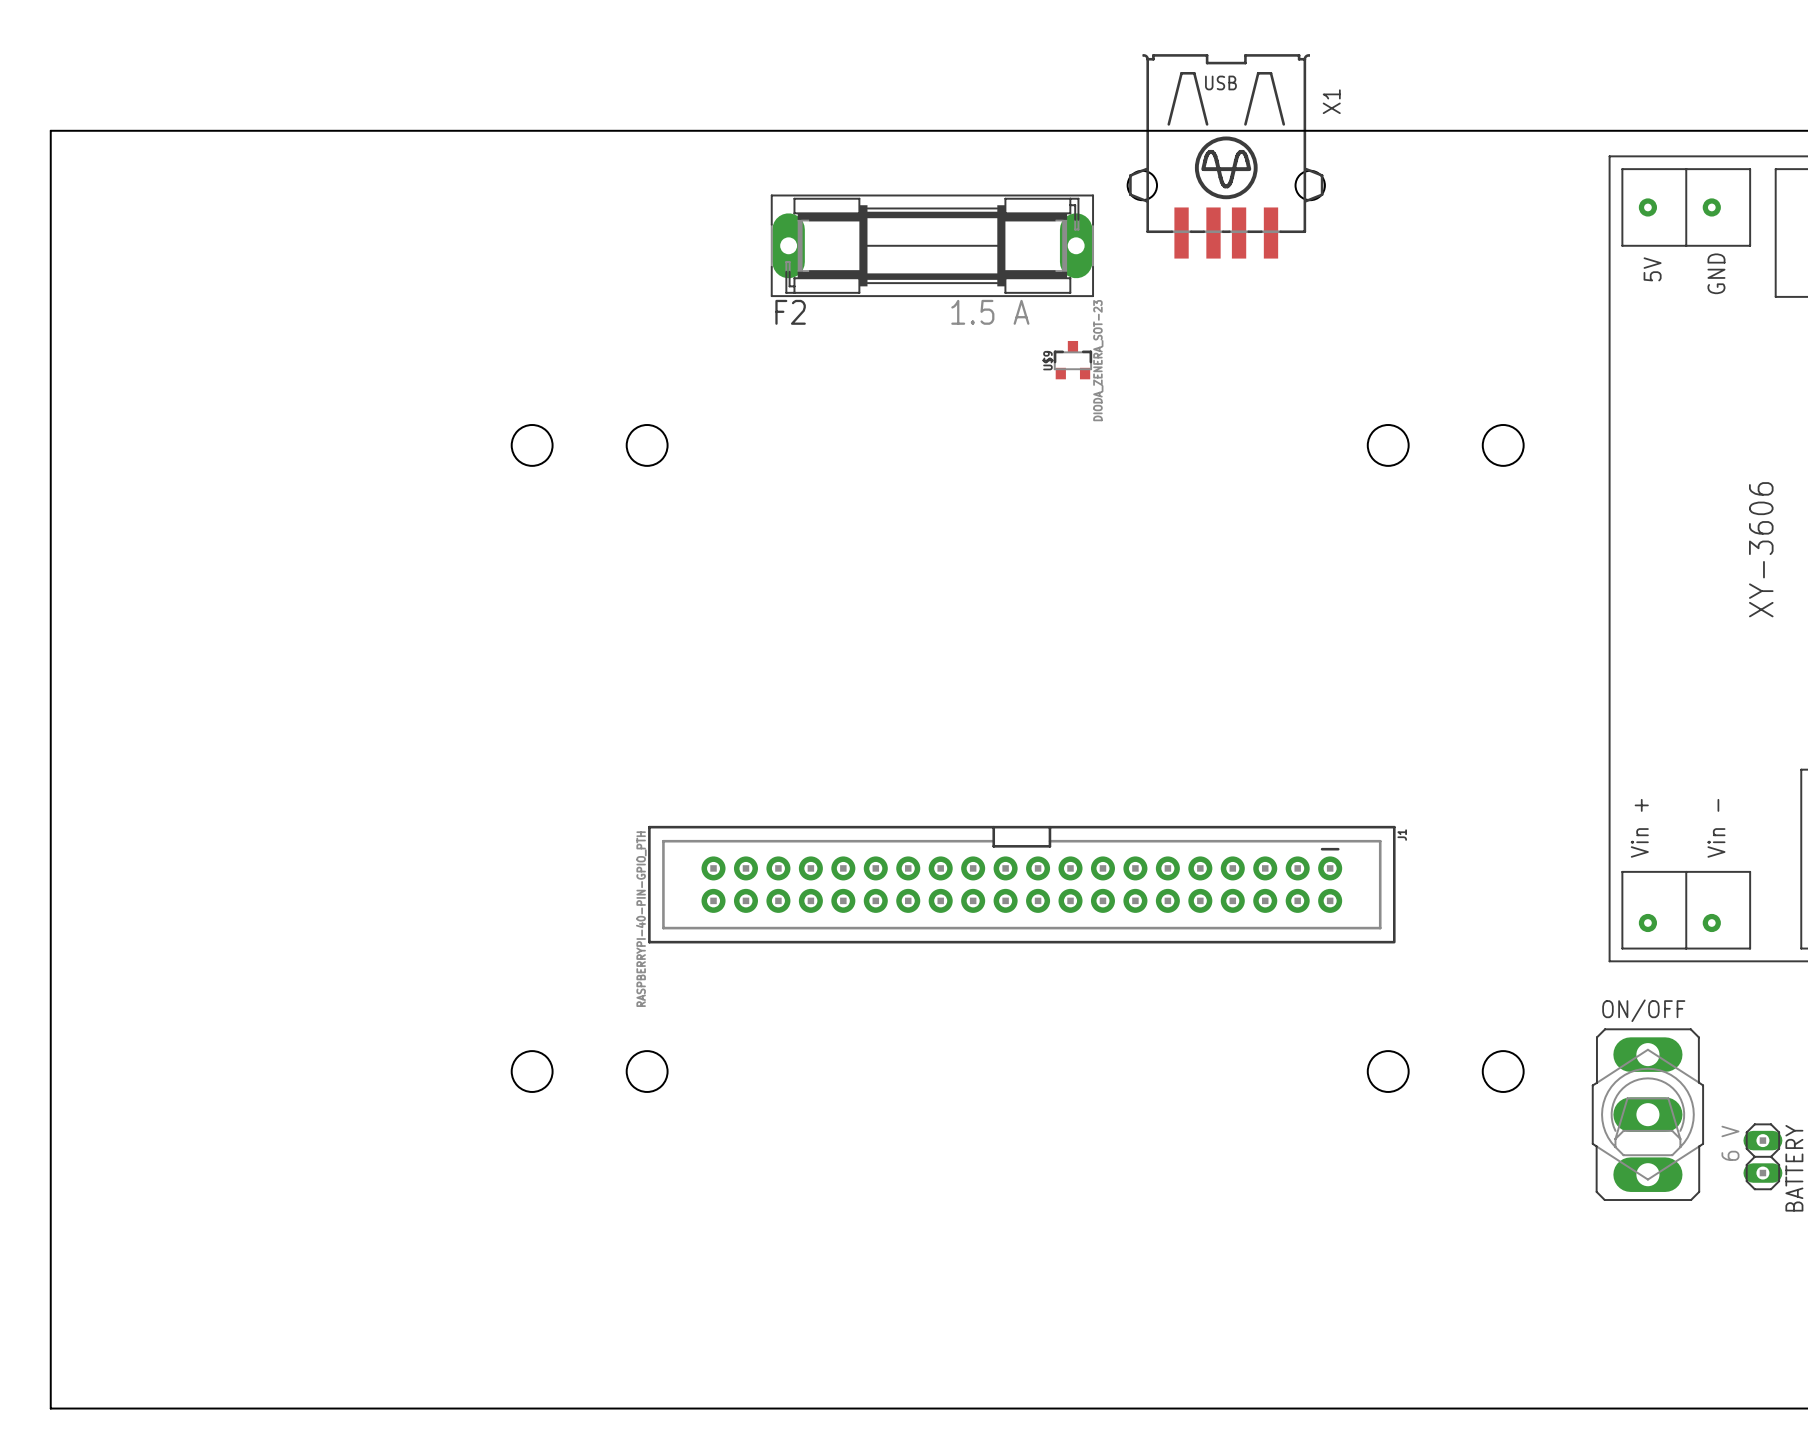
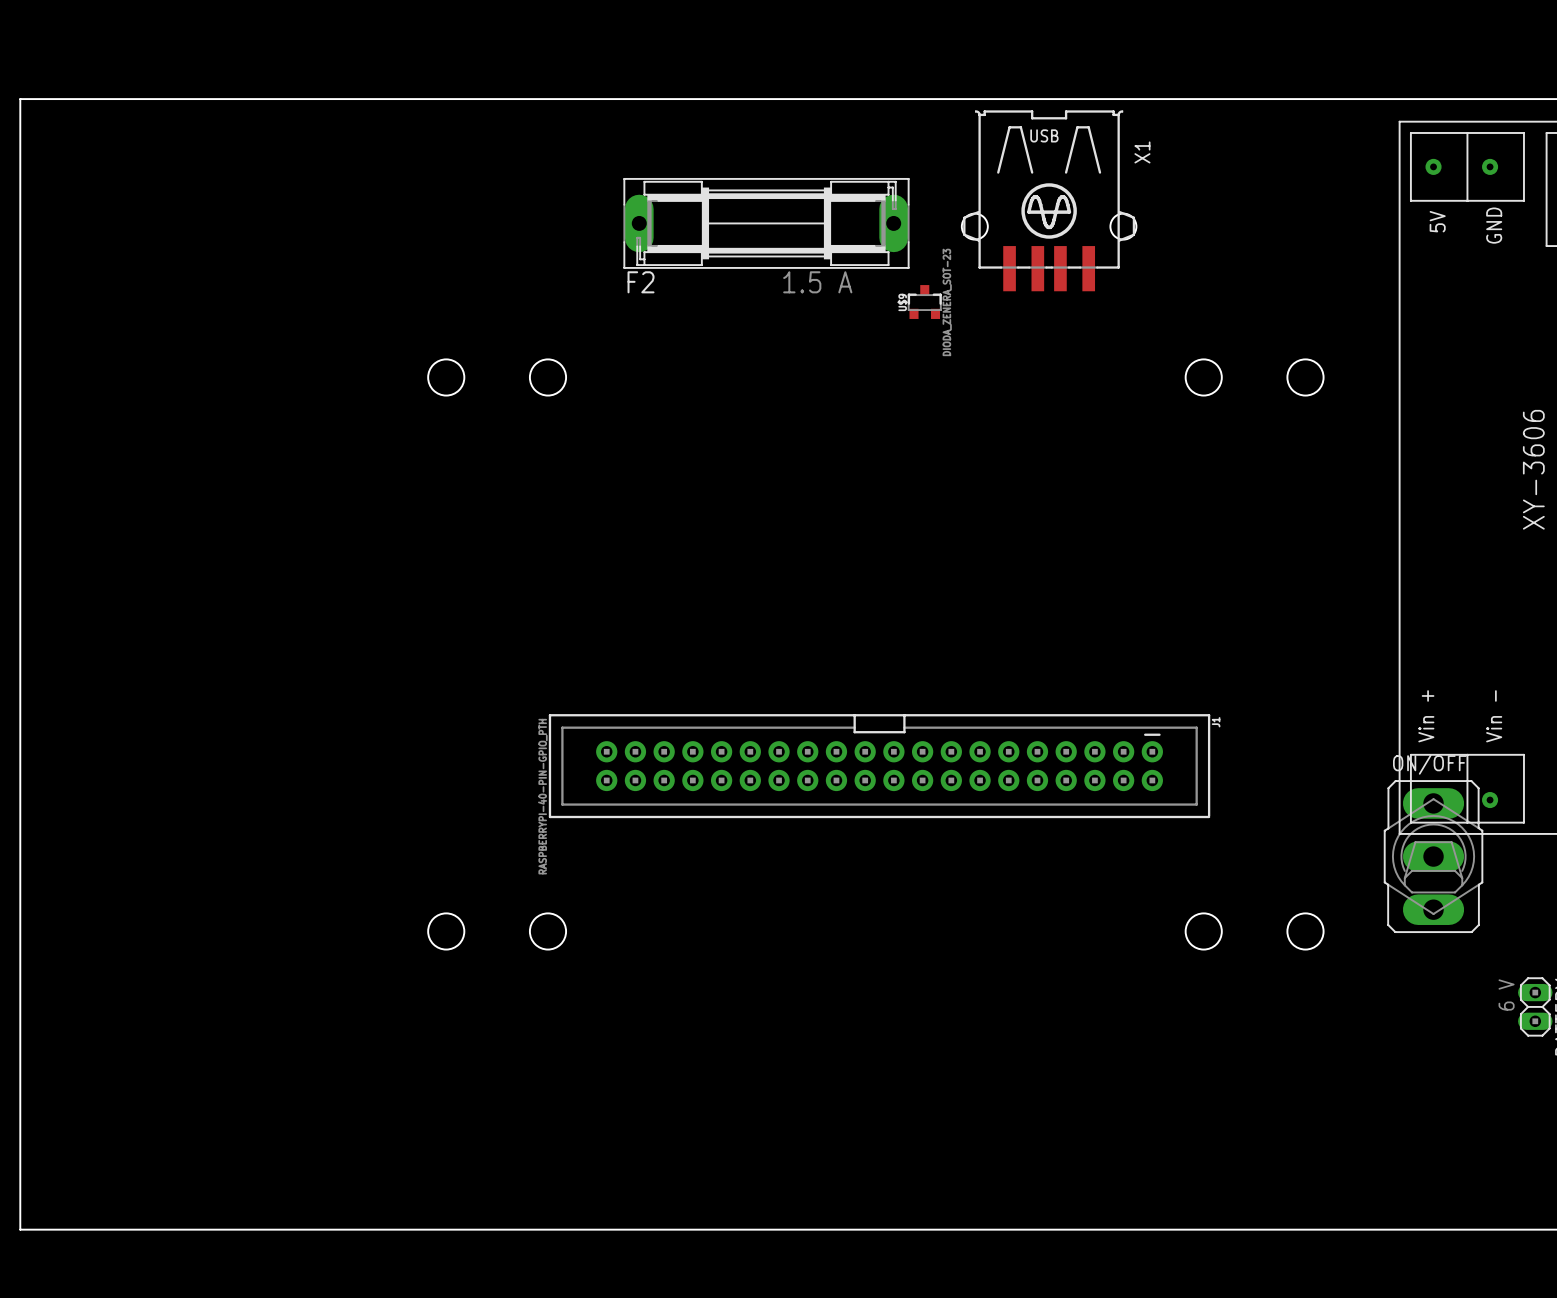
X1 position: (1226, 156) -> (1049, 200)
F2 position: (932, 245) -> (766, 223)
ON/OFF position: (1647, 1114) -> (1433, 856)

